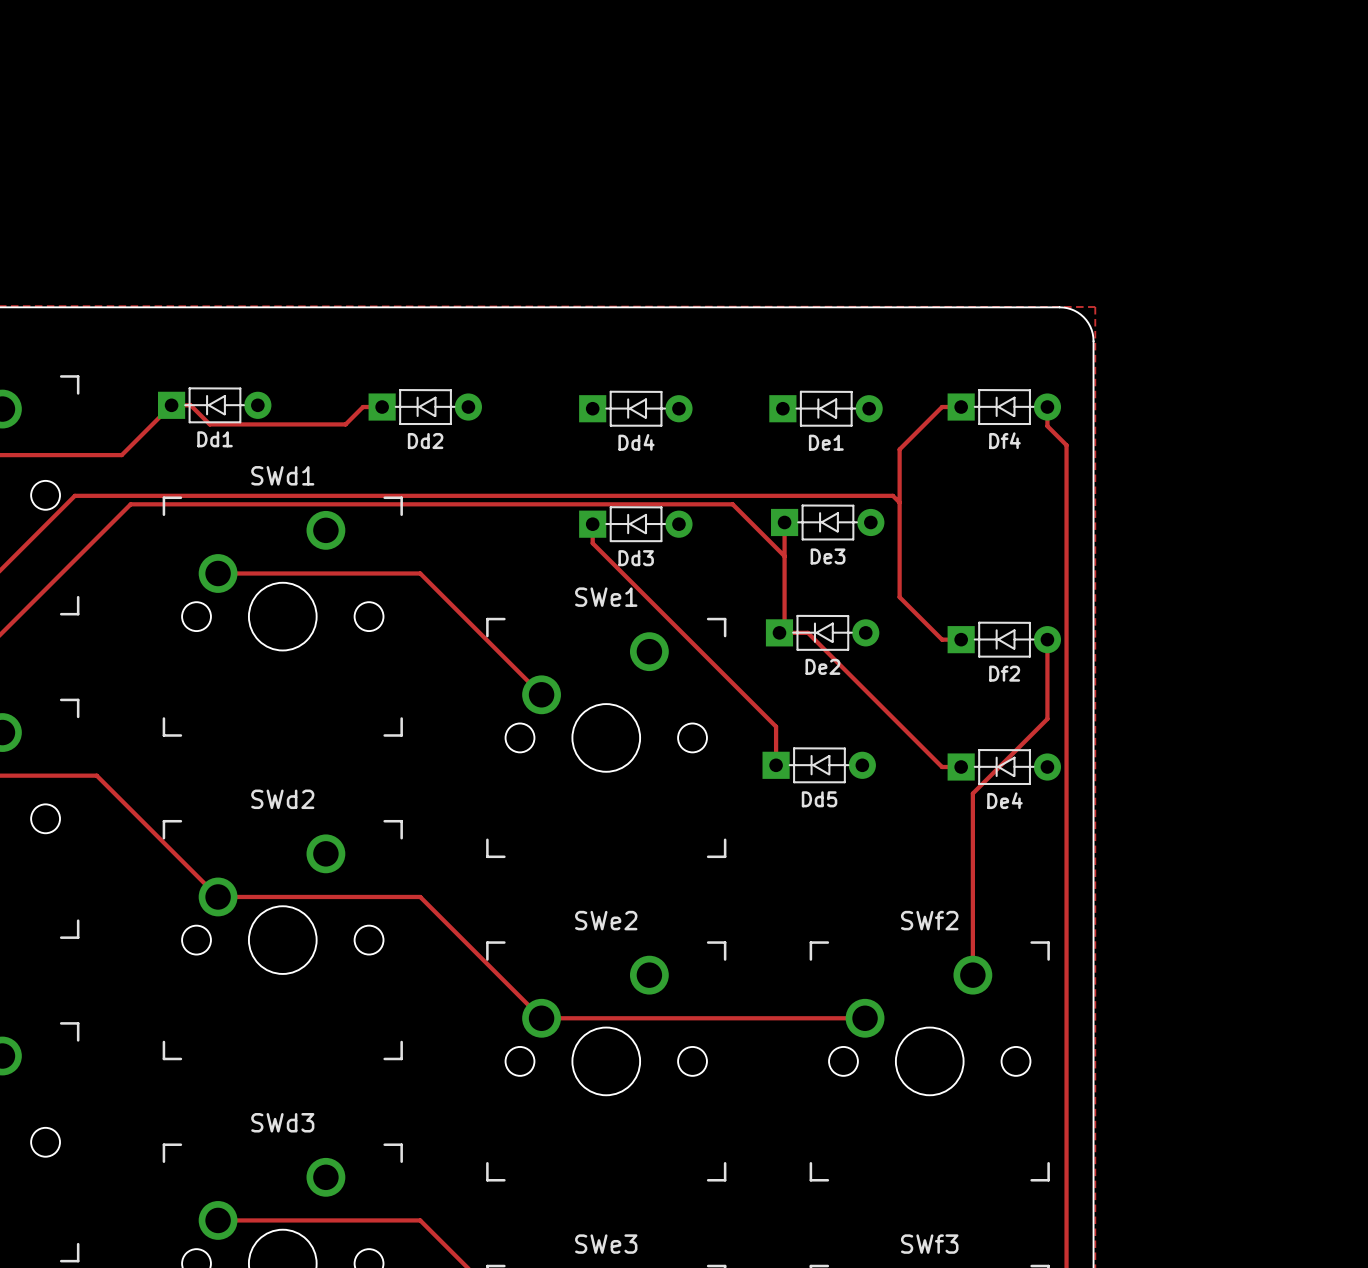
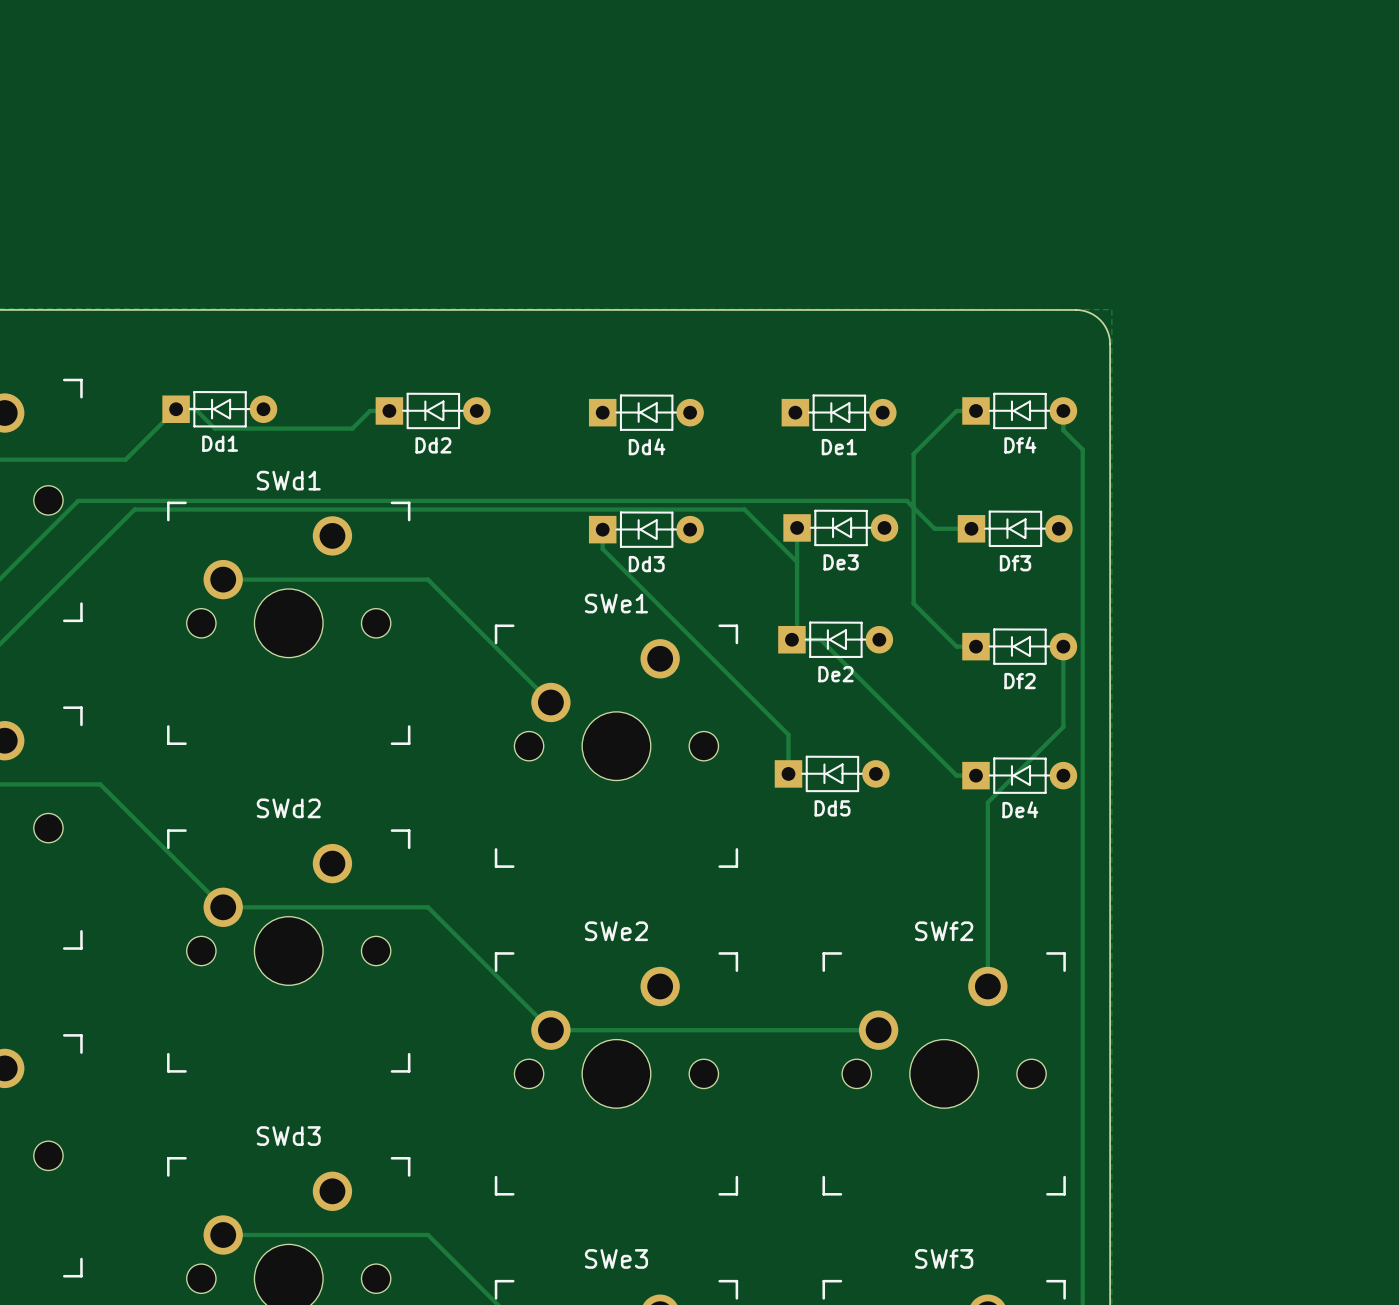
track: none -> (913, 507) (934, 528) (971, 528)
Df3: none -> (1015, 528)

